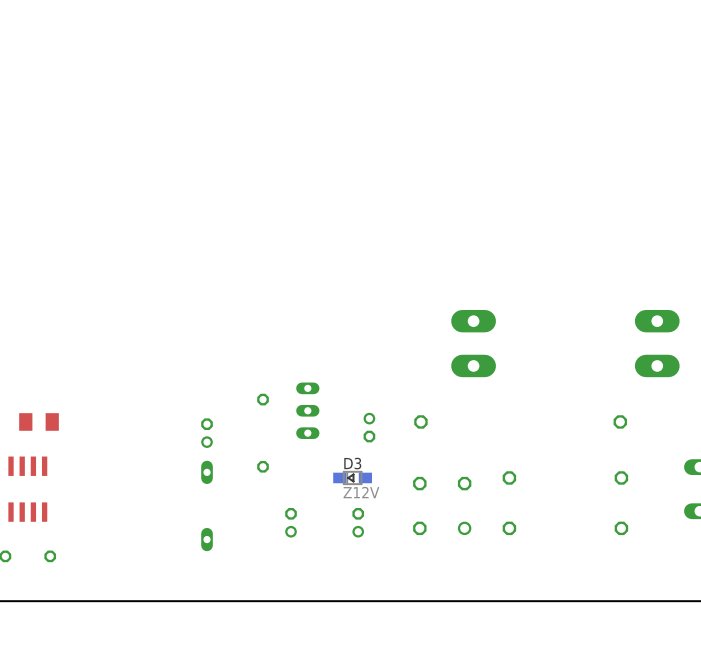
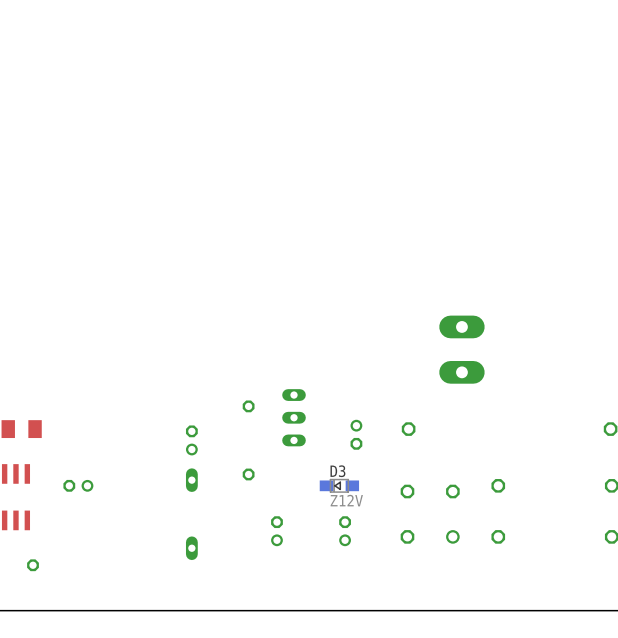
part: none -> (78, 485)

